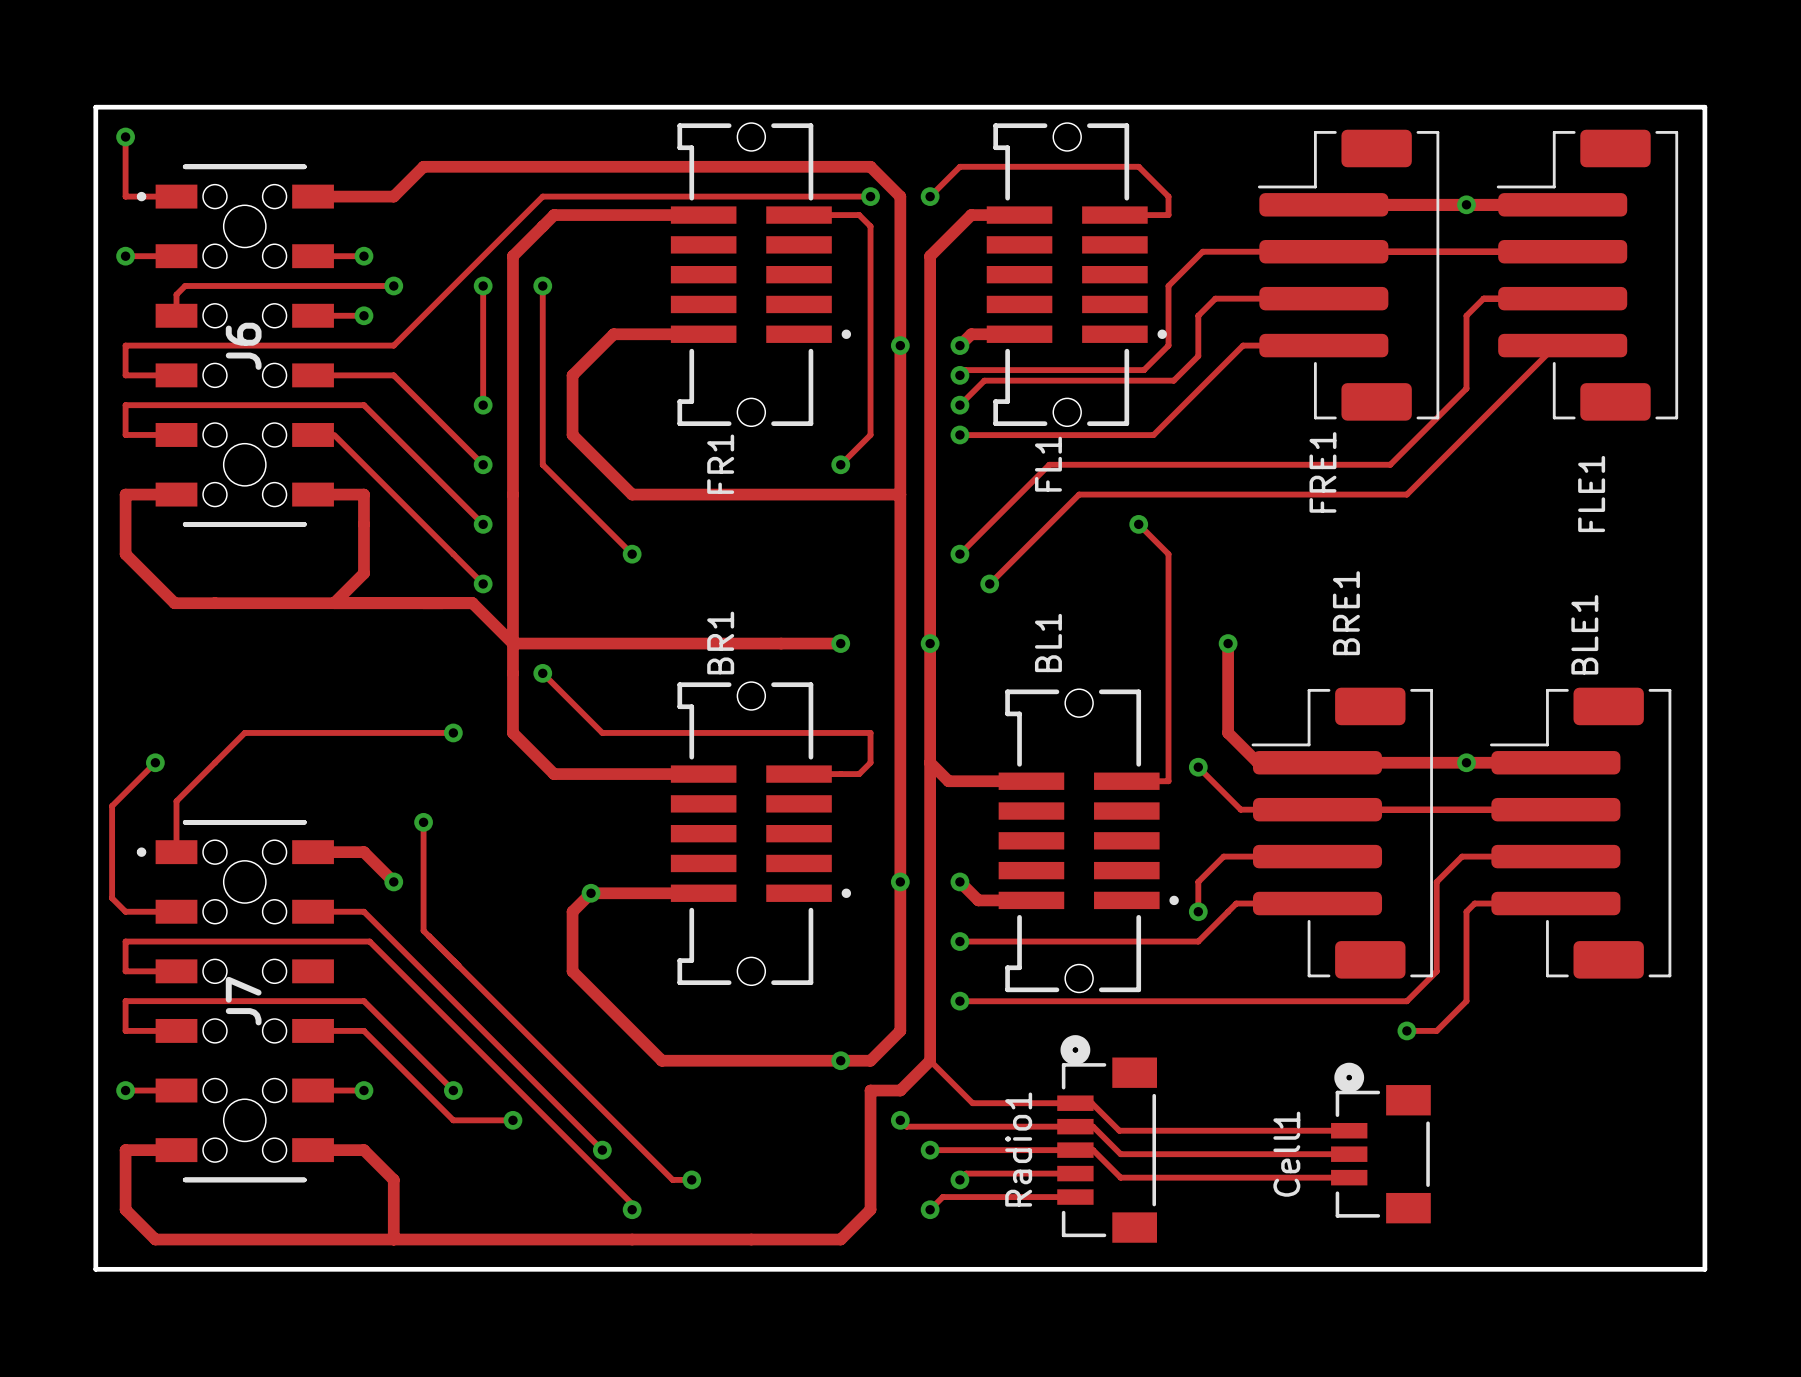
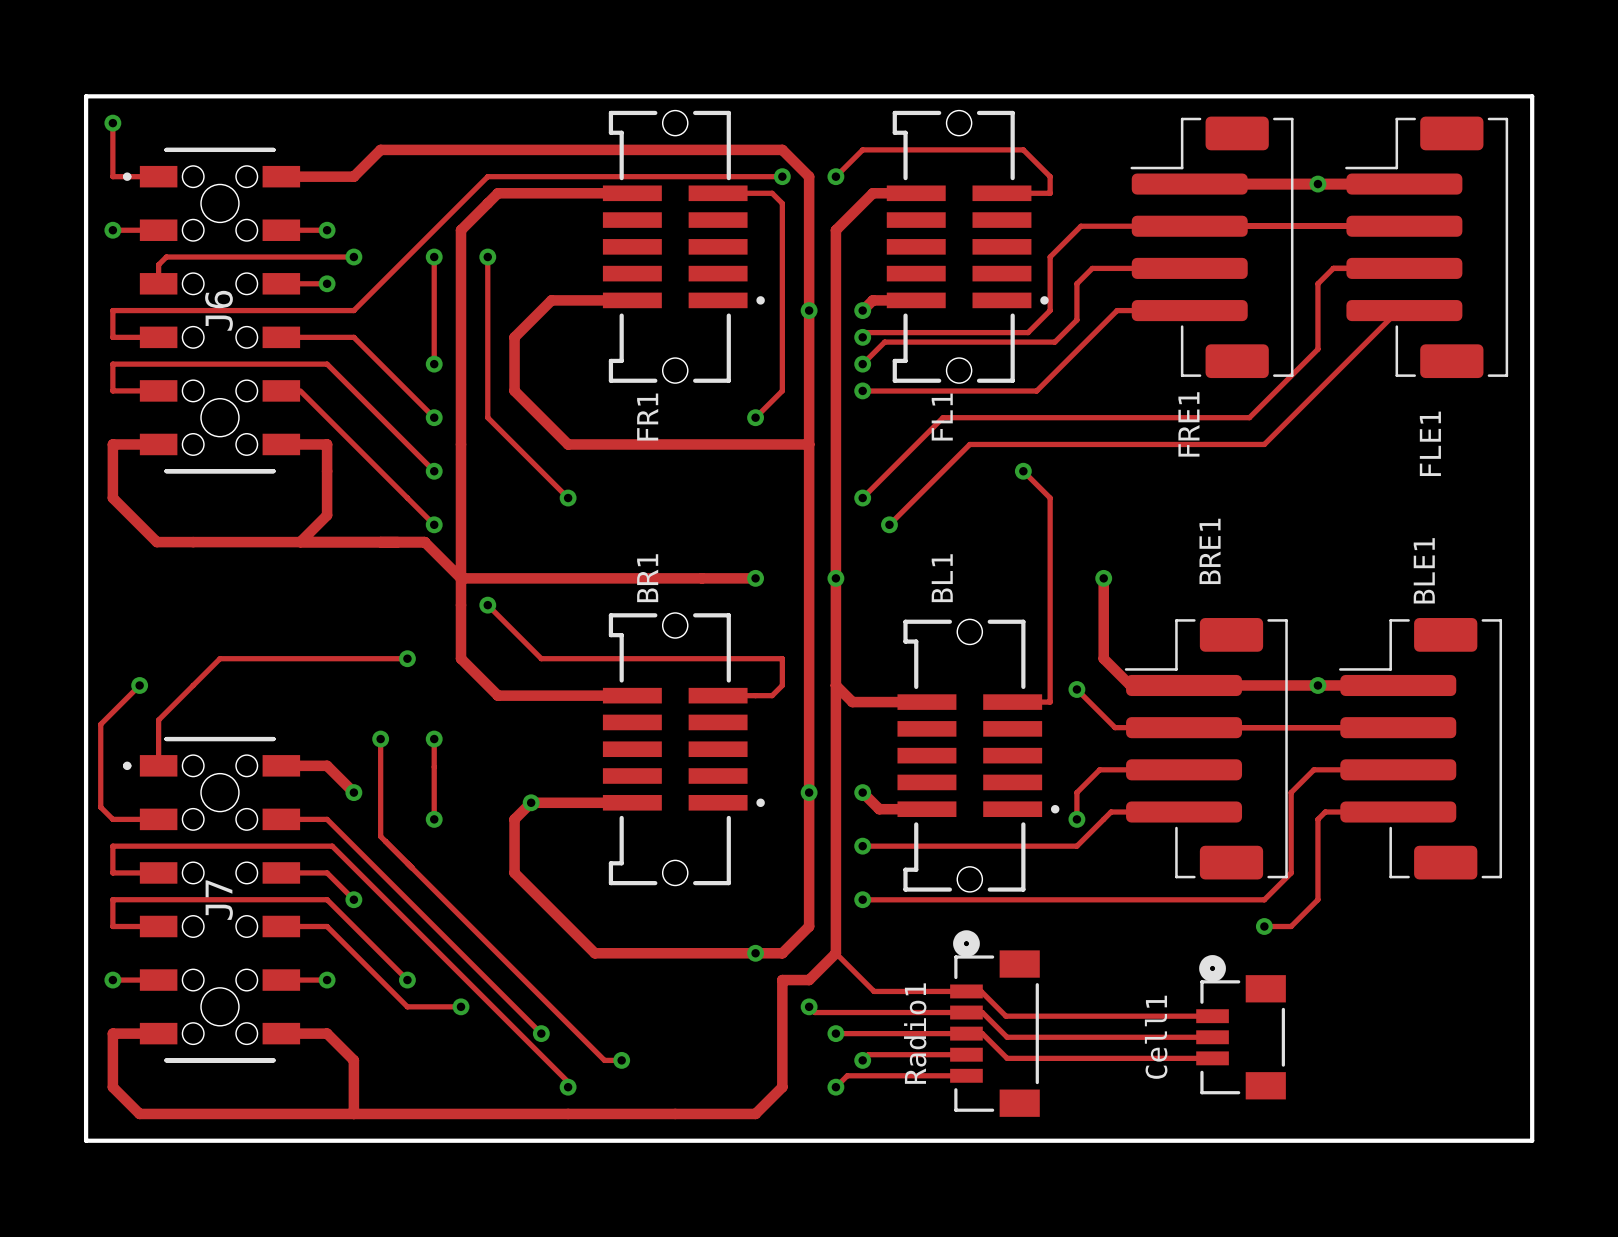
track: none -> (434, 739) (434, 819)
via: none -> (434, 739)
via: none -> (434, 819)
track: none -> (281, 872) (327, 872) (353, 899)
via: none -> (353, 899)

